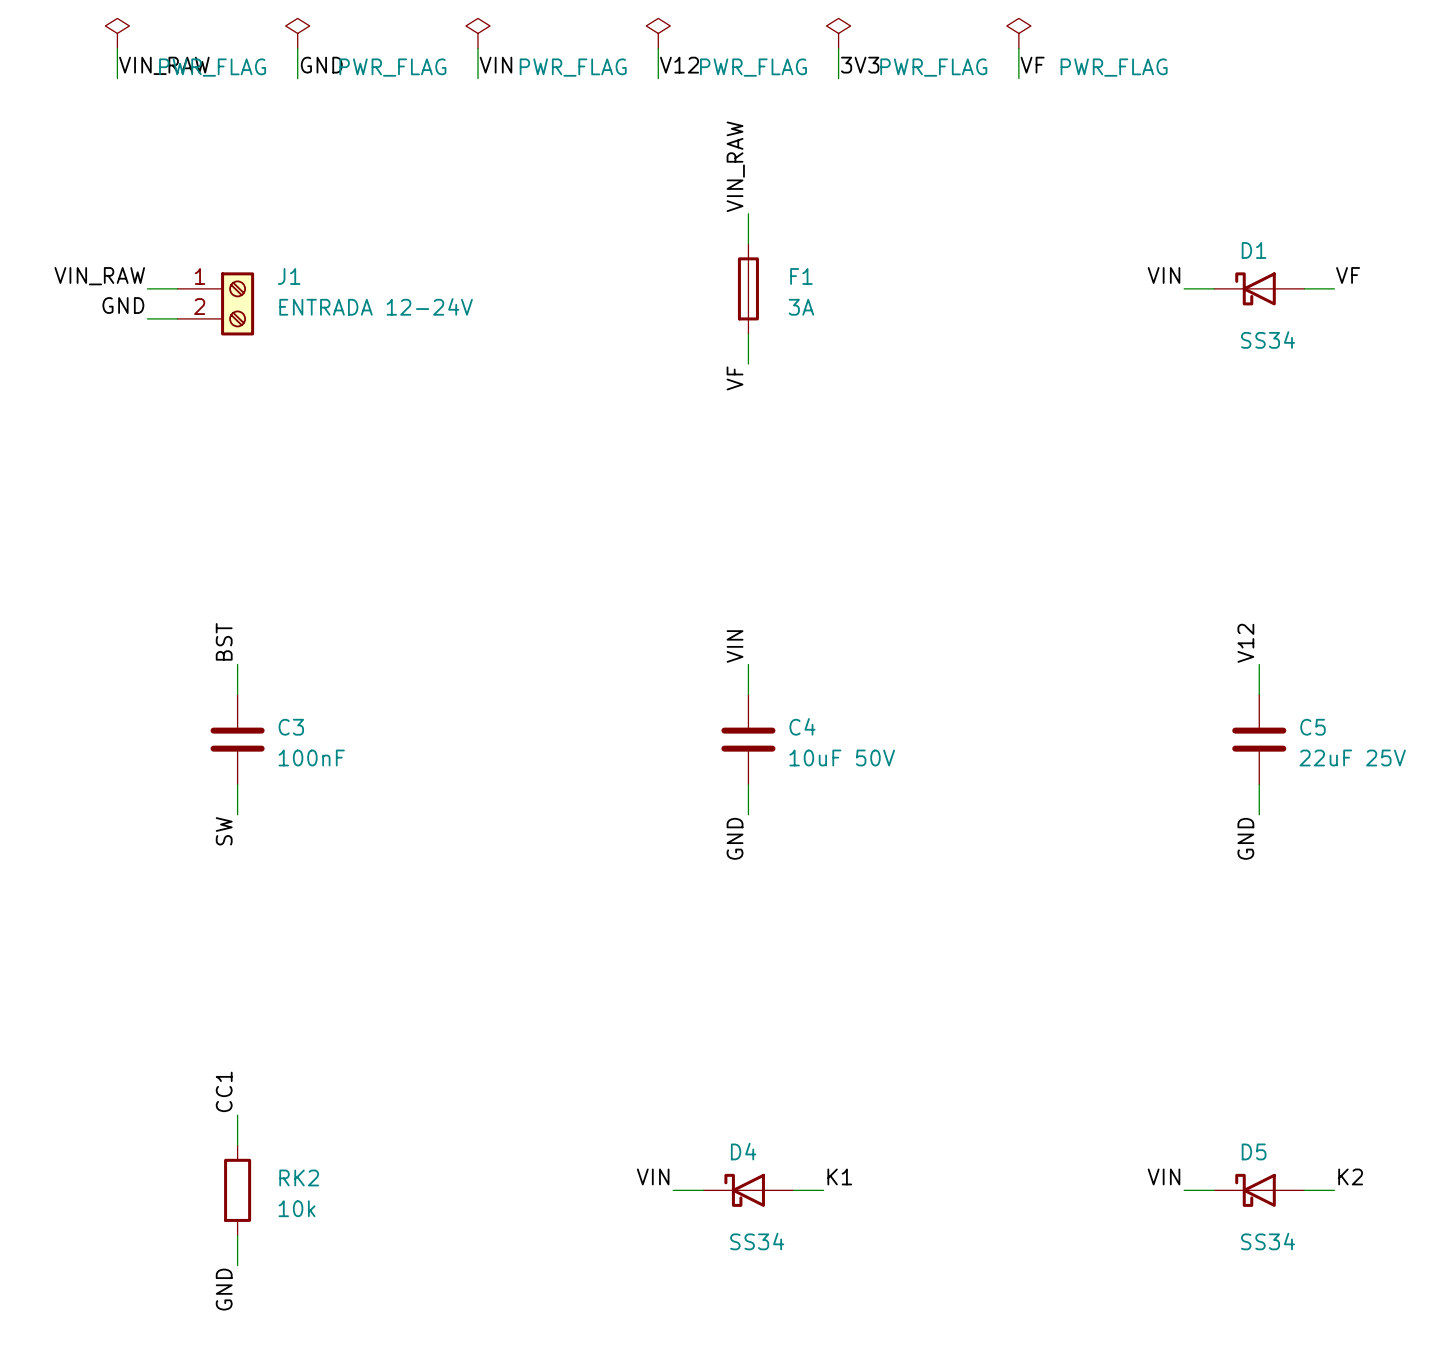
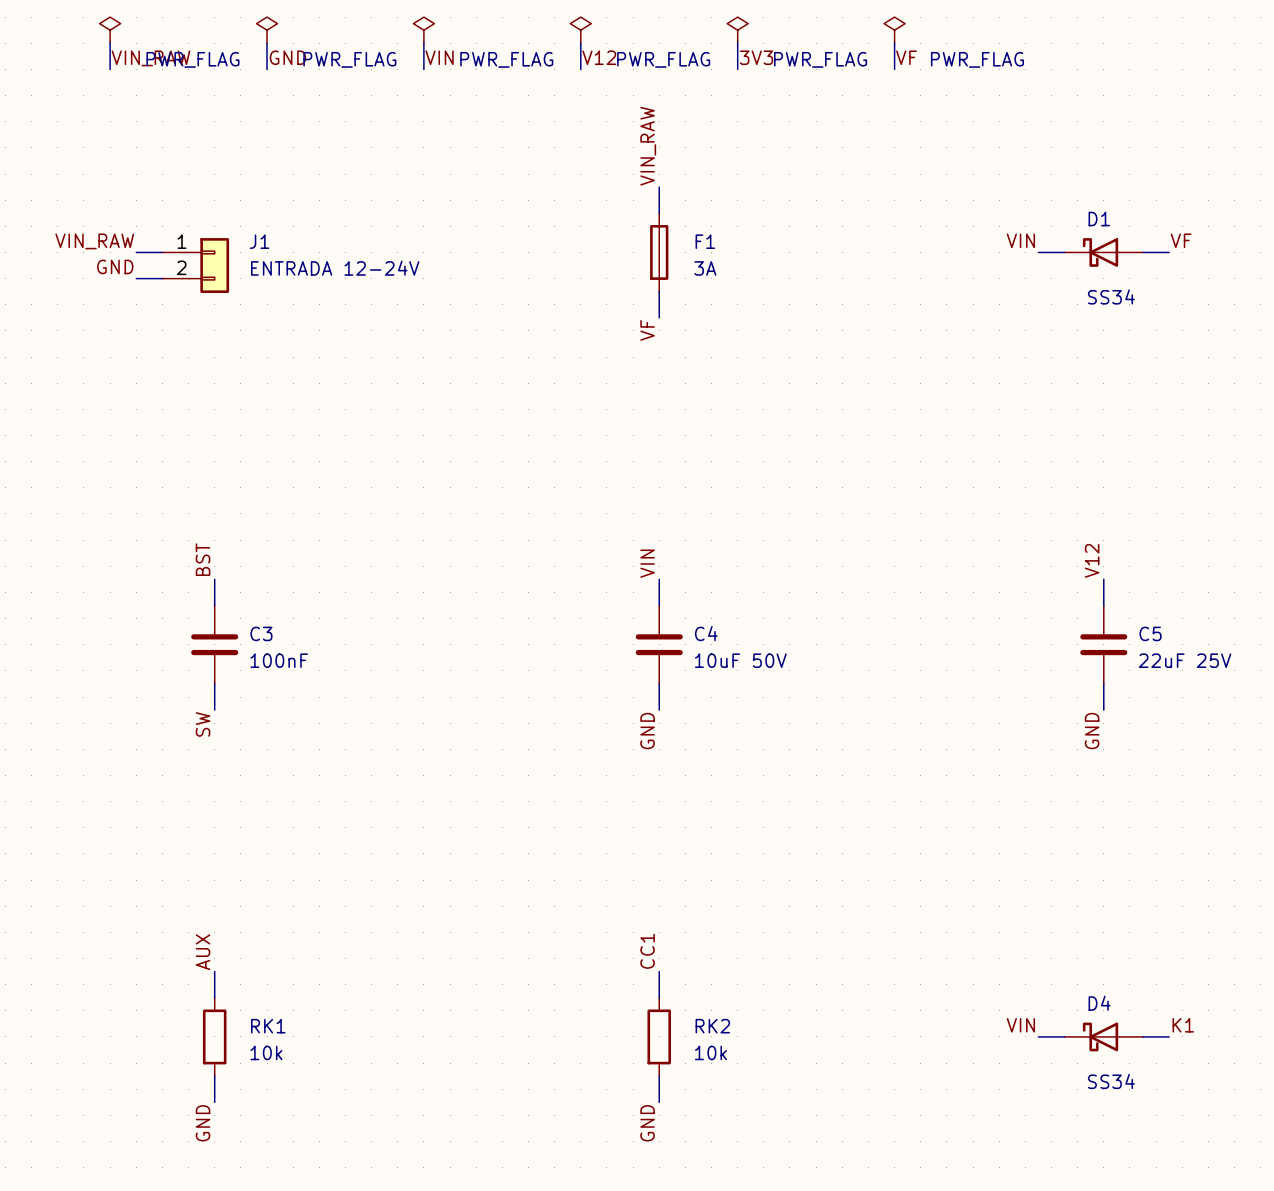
J1 symbol: [177, 272, 255, 336] -> [162, 238, 230, 294]
label: CC1 (224, 1091) -> AUX (203, 952)
label: none -> CC1 (647, 951)
wire: none -> (659, 971) (659, 997)
D5 name: D5 (1254, 1151) -> D4 (1099, 1003)
label: VIN (653, 1176) -> none
label: K1 (839, 1176) -> none
label: K2 (1350, 1176) -> K1 (1183, 1025)
RK2 name: RK2 (299, 1177) -> RK1 (268, 1026)
wire: (673, 1190) (703, 1190) -> none
D4: SS34 (748, 1190) -> none
RK2: none -> 10k (659, 1036)
wire: (793, 1190) (823, 1190) -> none
wire: none -> (659, 1076) (659, 1102)
label: none -> GND (647, 1123)

